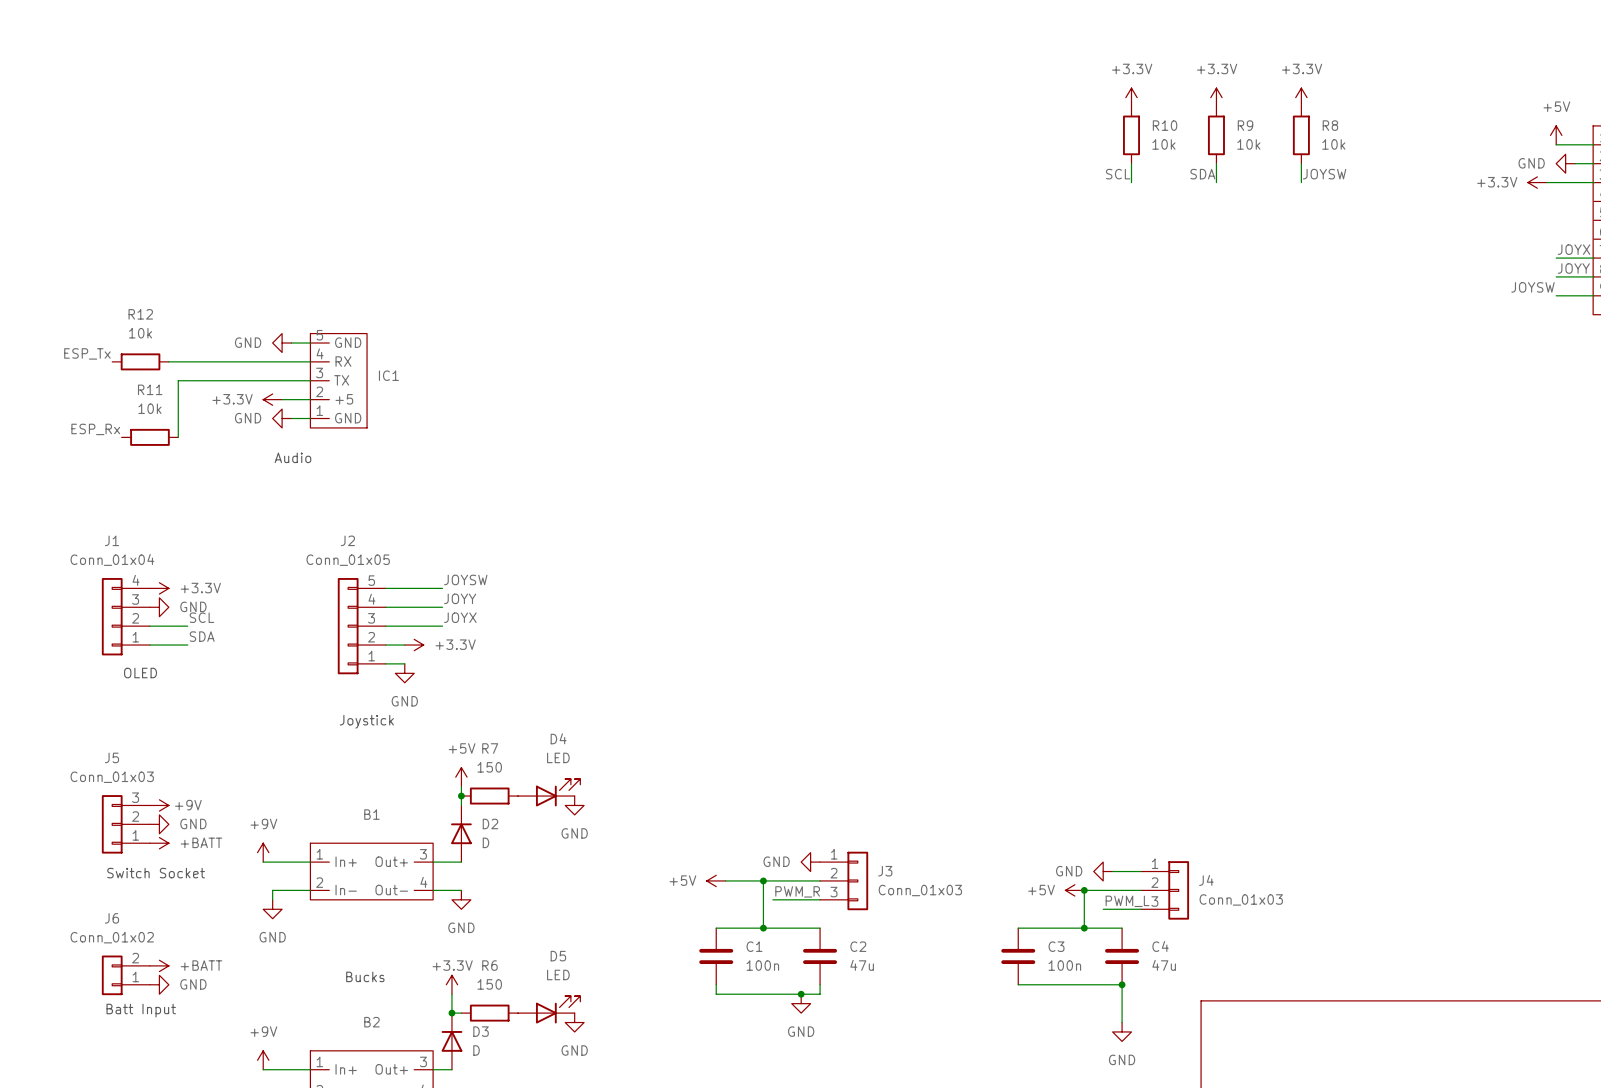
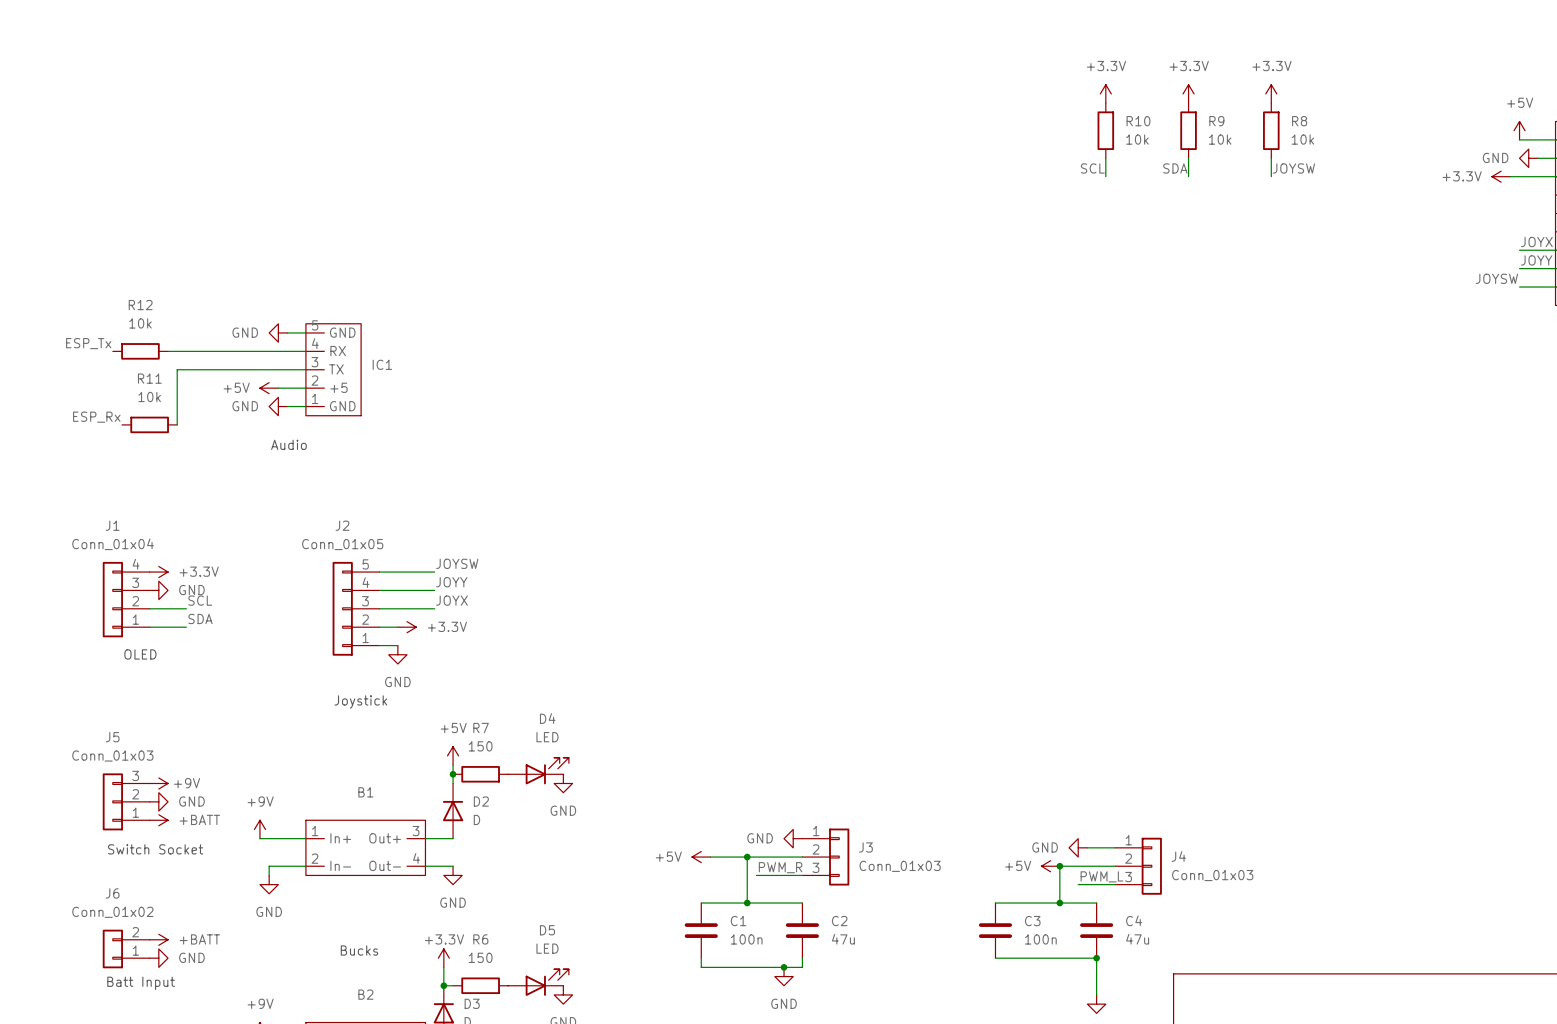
power symbol: +3.3V (272, 399) -> +5V (269, 388)

